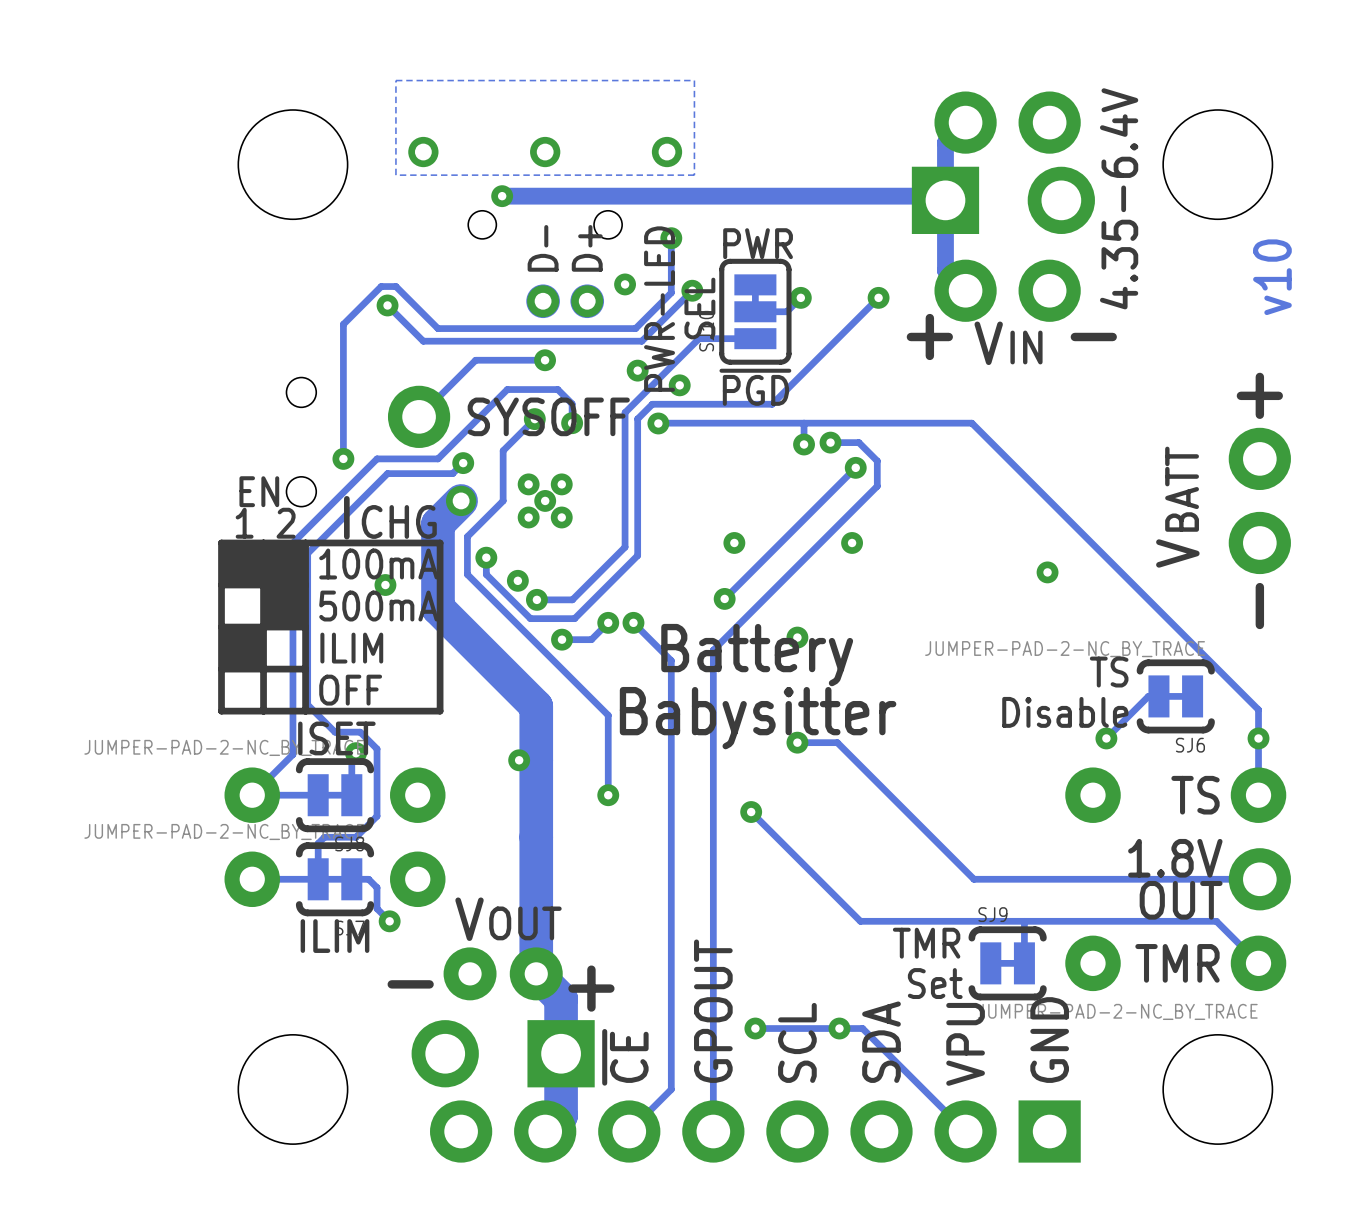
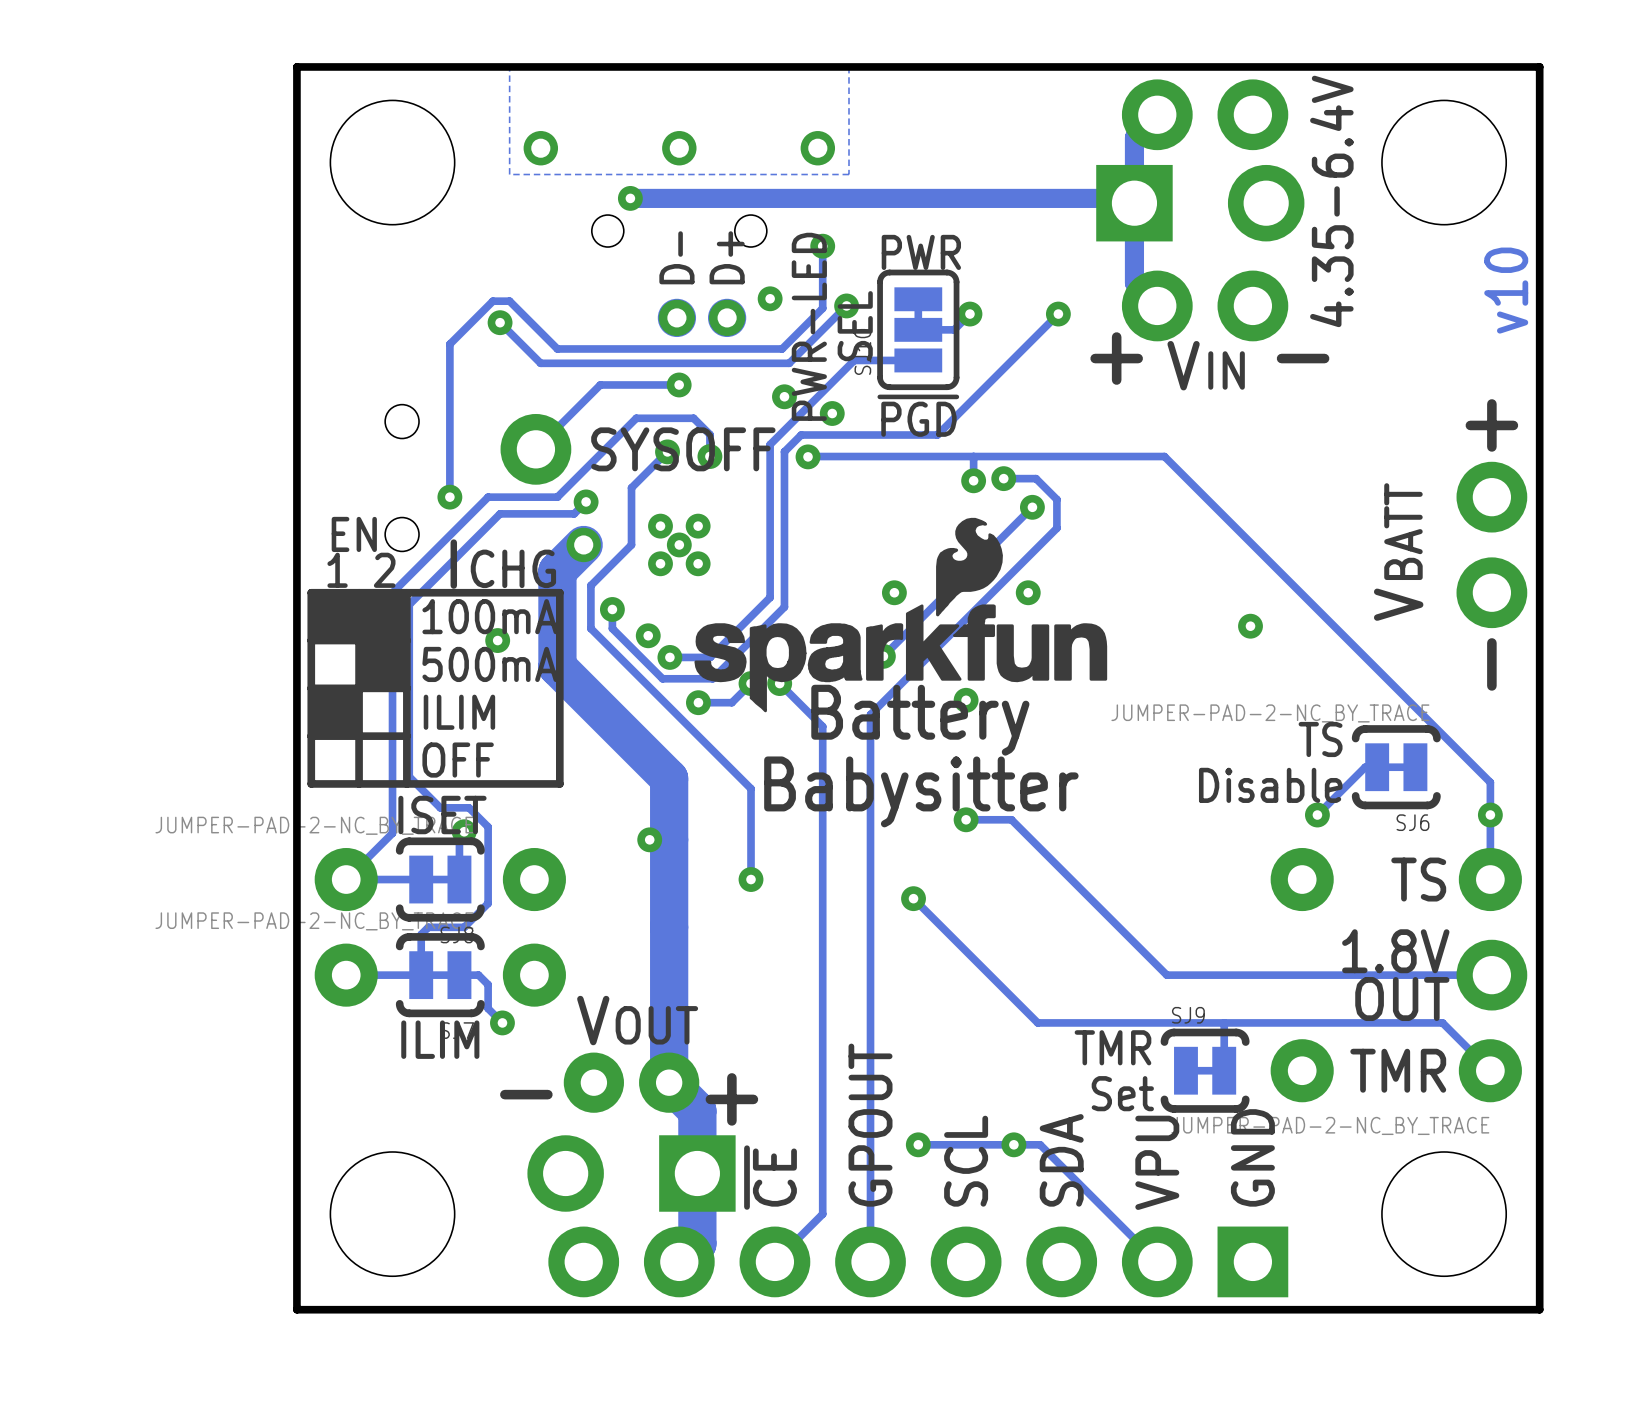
board edge: none -> (1539, 66) (296, 66) (296, 1309) (1539, 1309) (1539, 66)
drawing: none -> [694, 517, 1108, 713]

